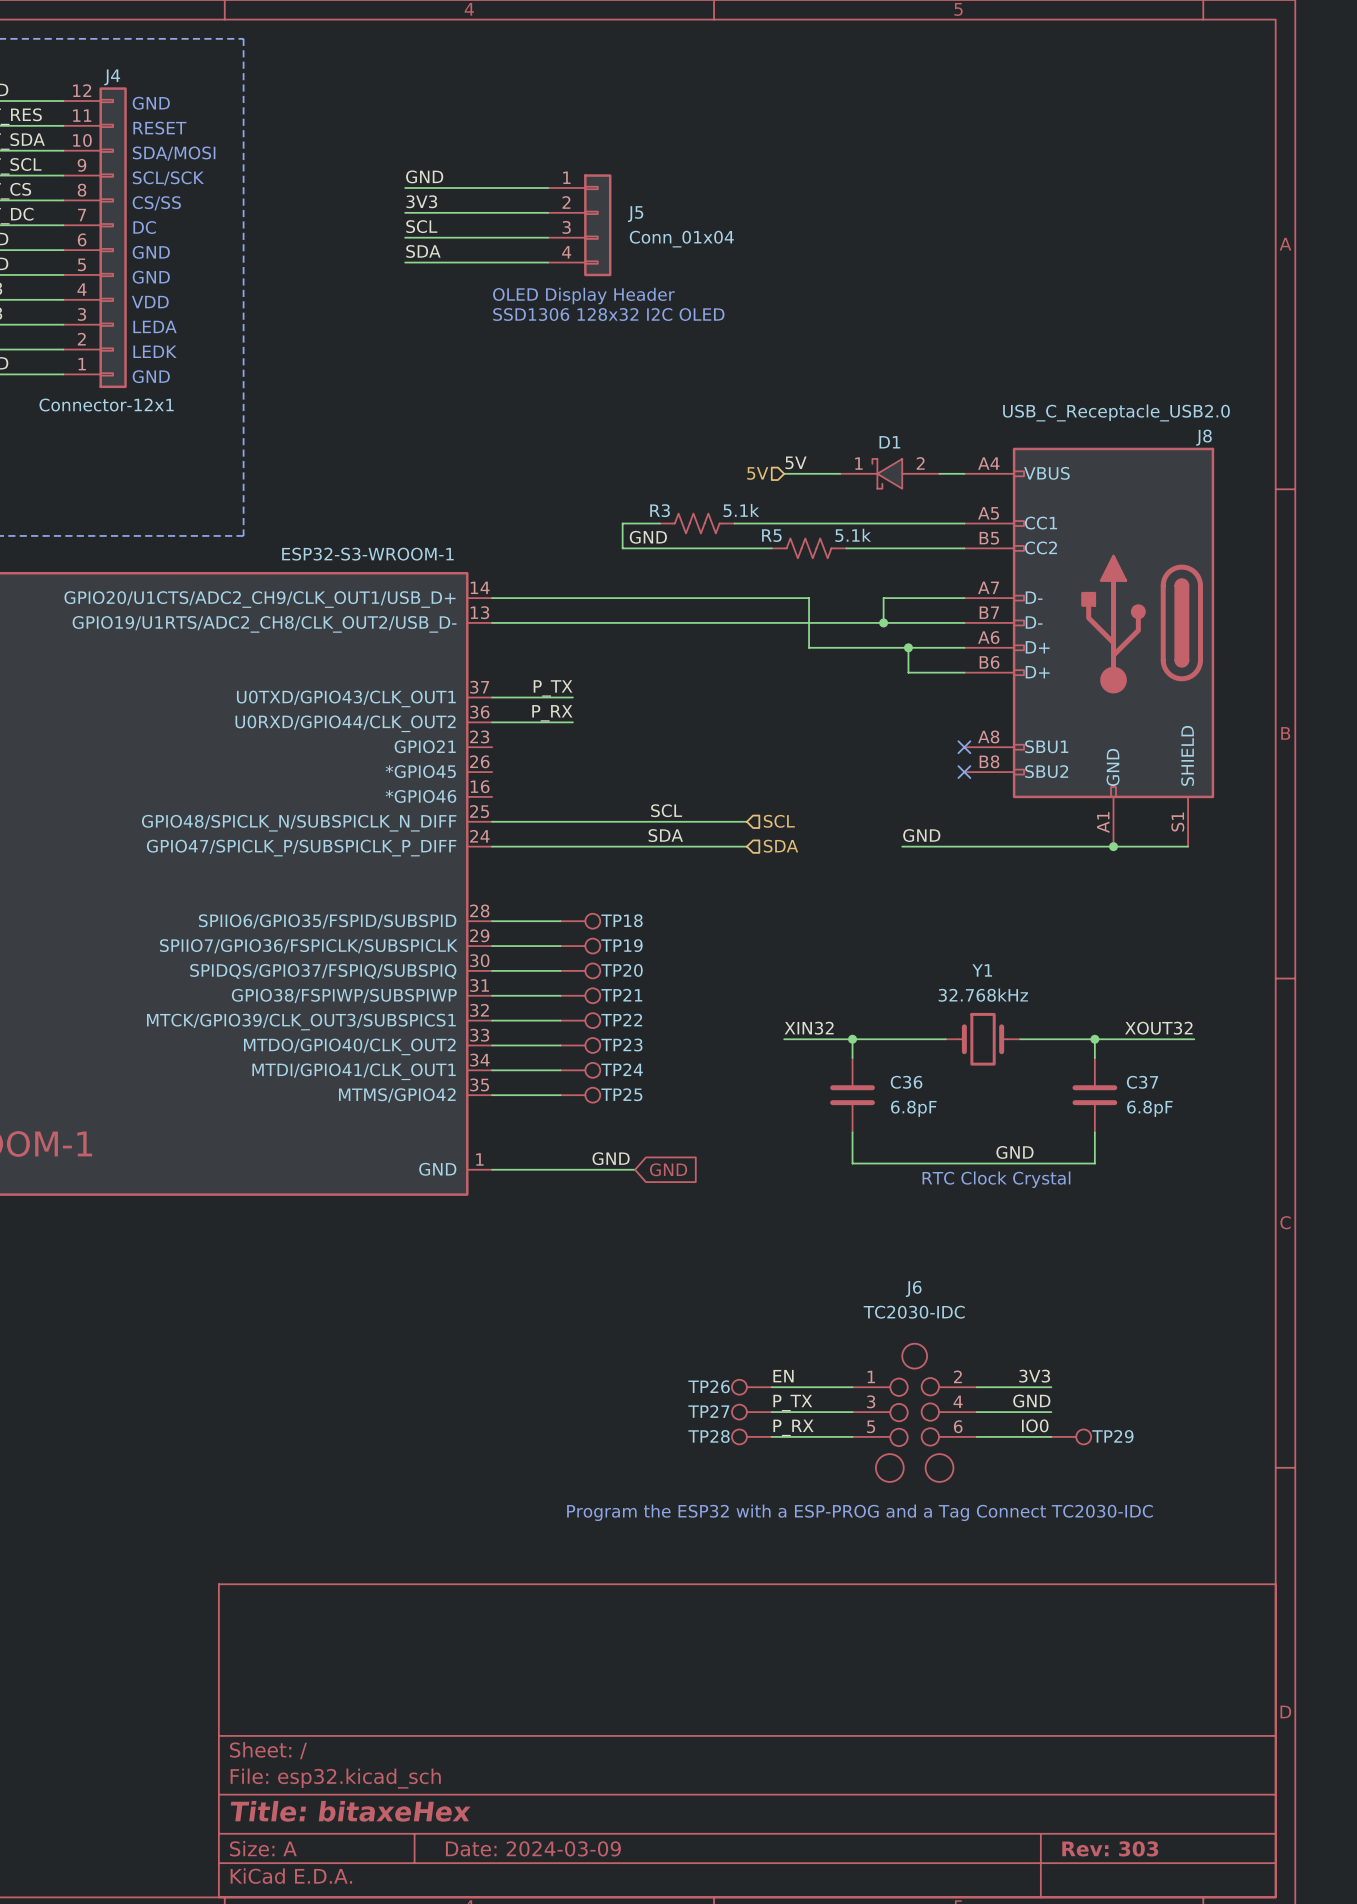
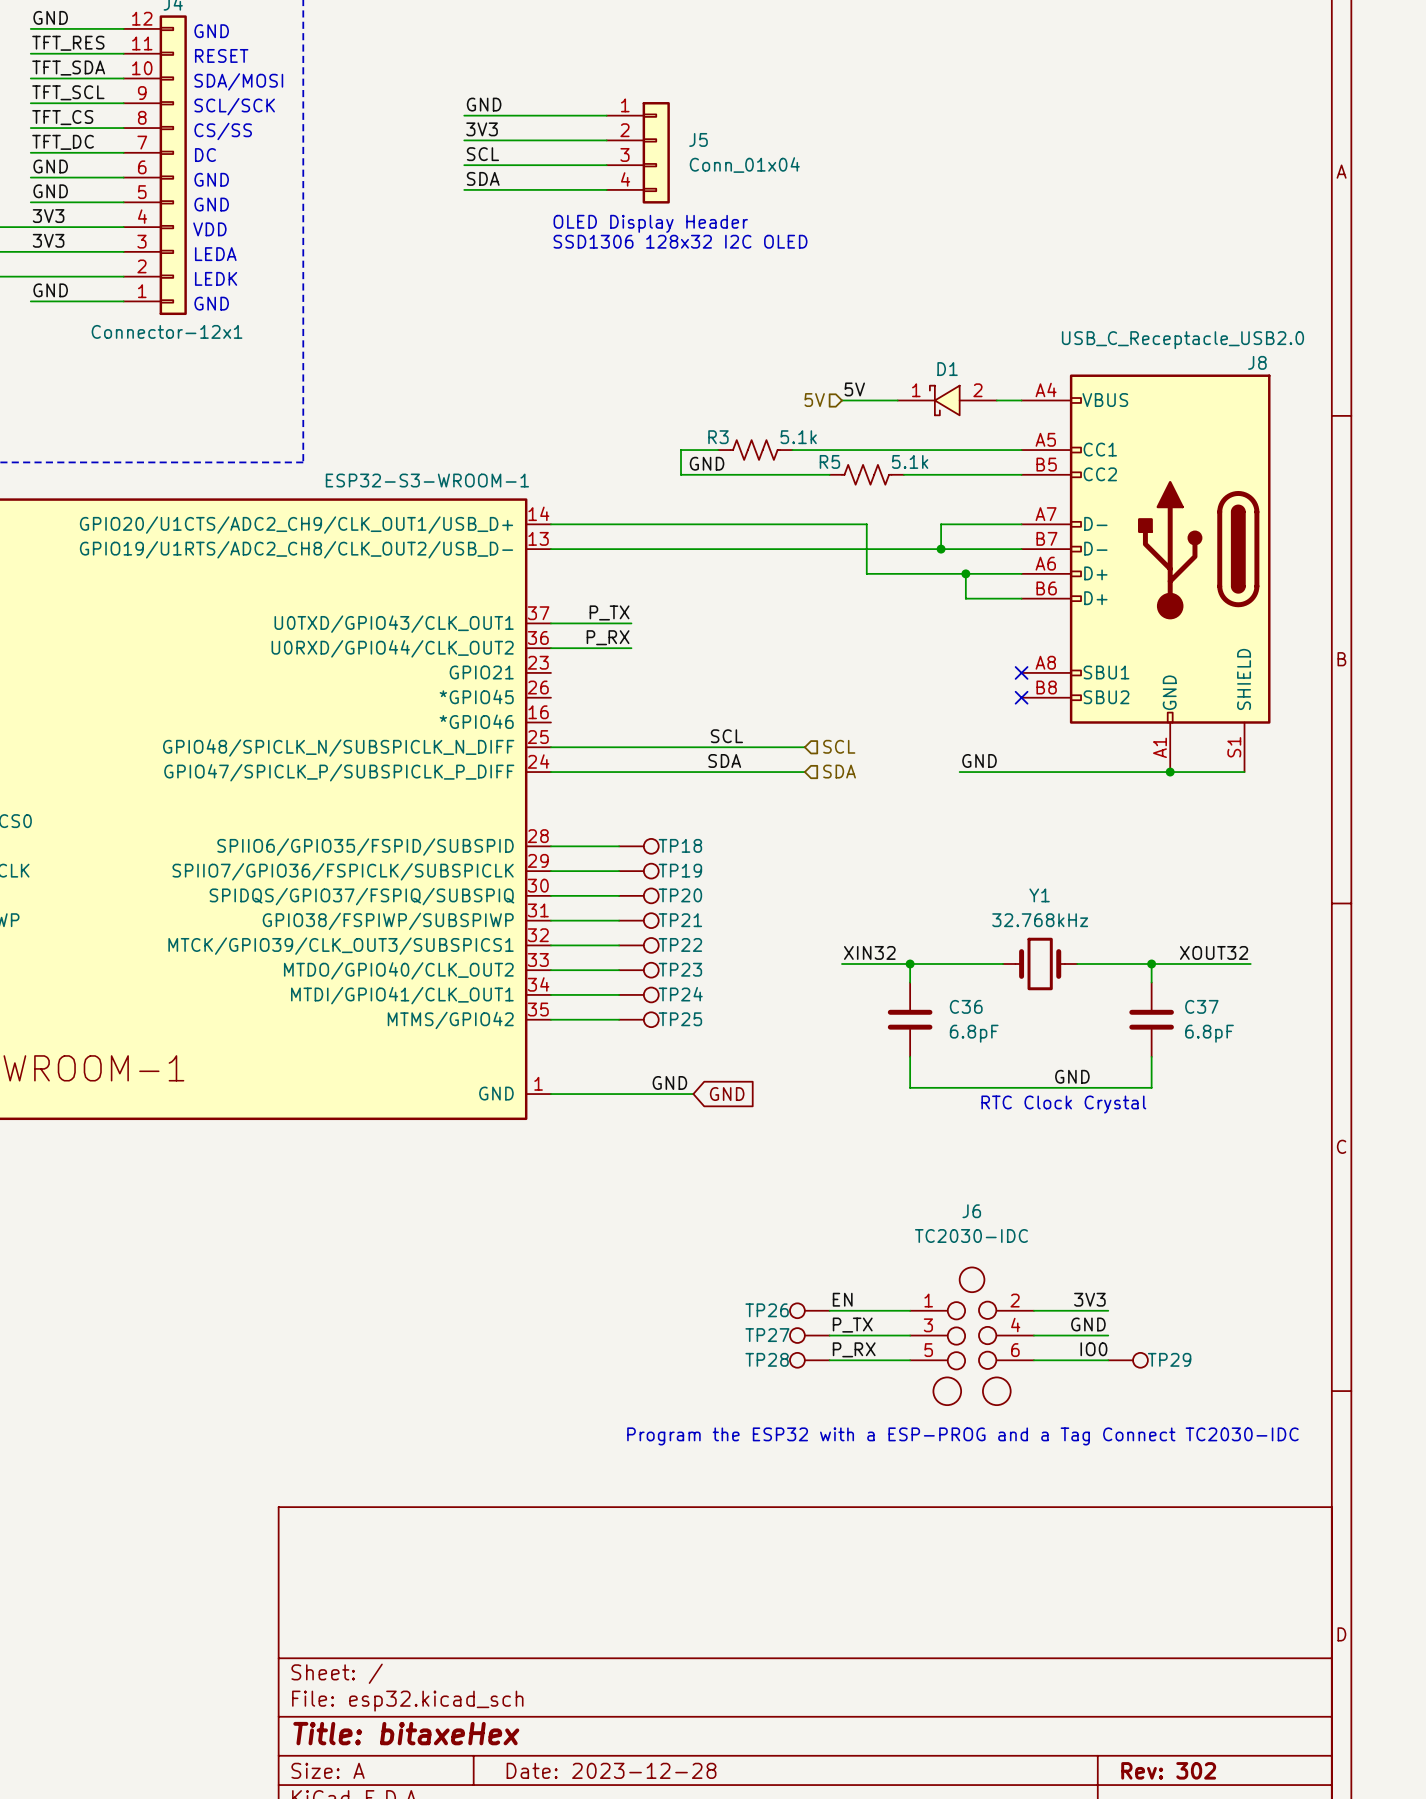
title block: Date: 2024-03-09 (533, 1848) -> Date: 2023-12-28 (611, 1770)
title block: Rev: 303 (1110, 1848) -> Rev: 302 (1168, 1770)

